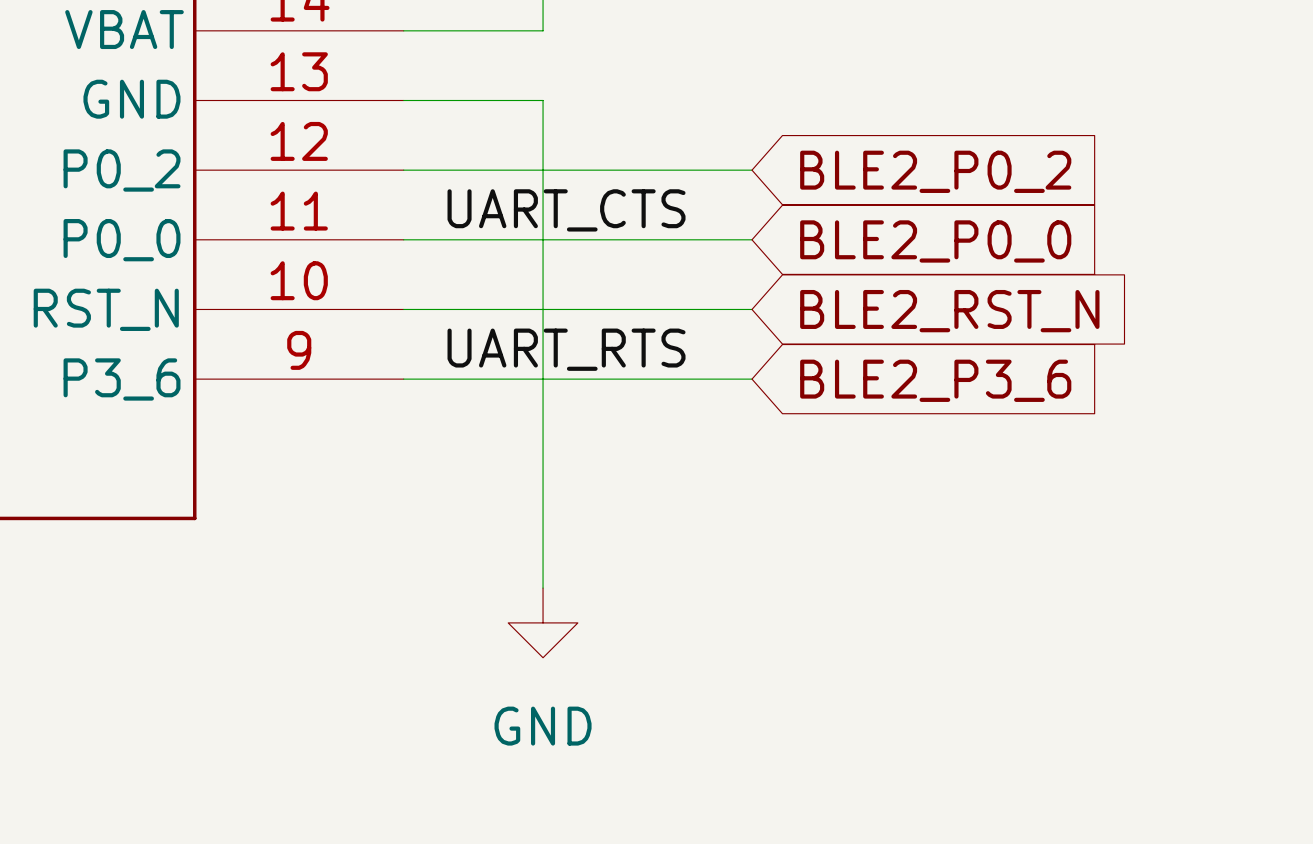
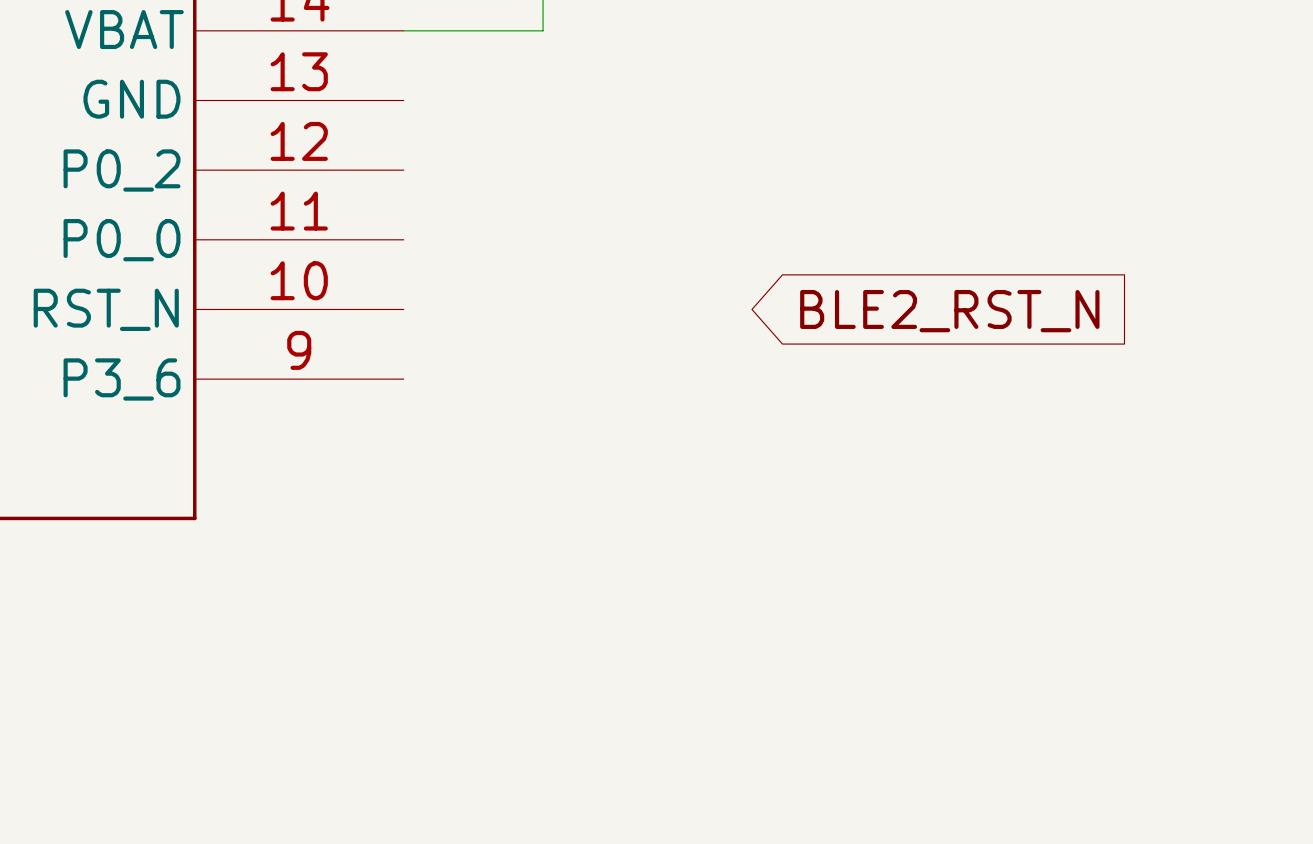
wire: (403, 100) (543, 100) (543, 588) -> none
wire: (403, 170) (752, 170) -> none
global label: BLE2_P0_2 (935, 171) -> none
label: UART_CTS (566, 210) -> none
wire: (403, 239) (752, 239) -> none
global label: BLE2_P0_0 (935, 241) -> none
wire: (403, 309) (752, 309) -> none
label: UART_RTS (566, 349) -> none
wire: (403, 379) (752, 379) -> none
global label: BLE2_P3_6 (935, 380) -> none
power symbol: GND (543, 622) -> none

